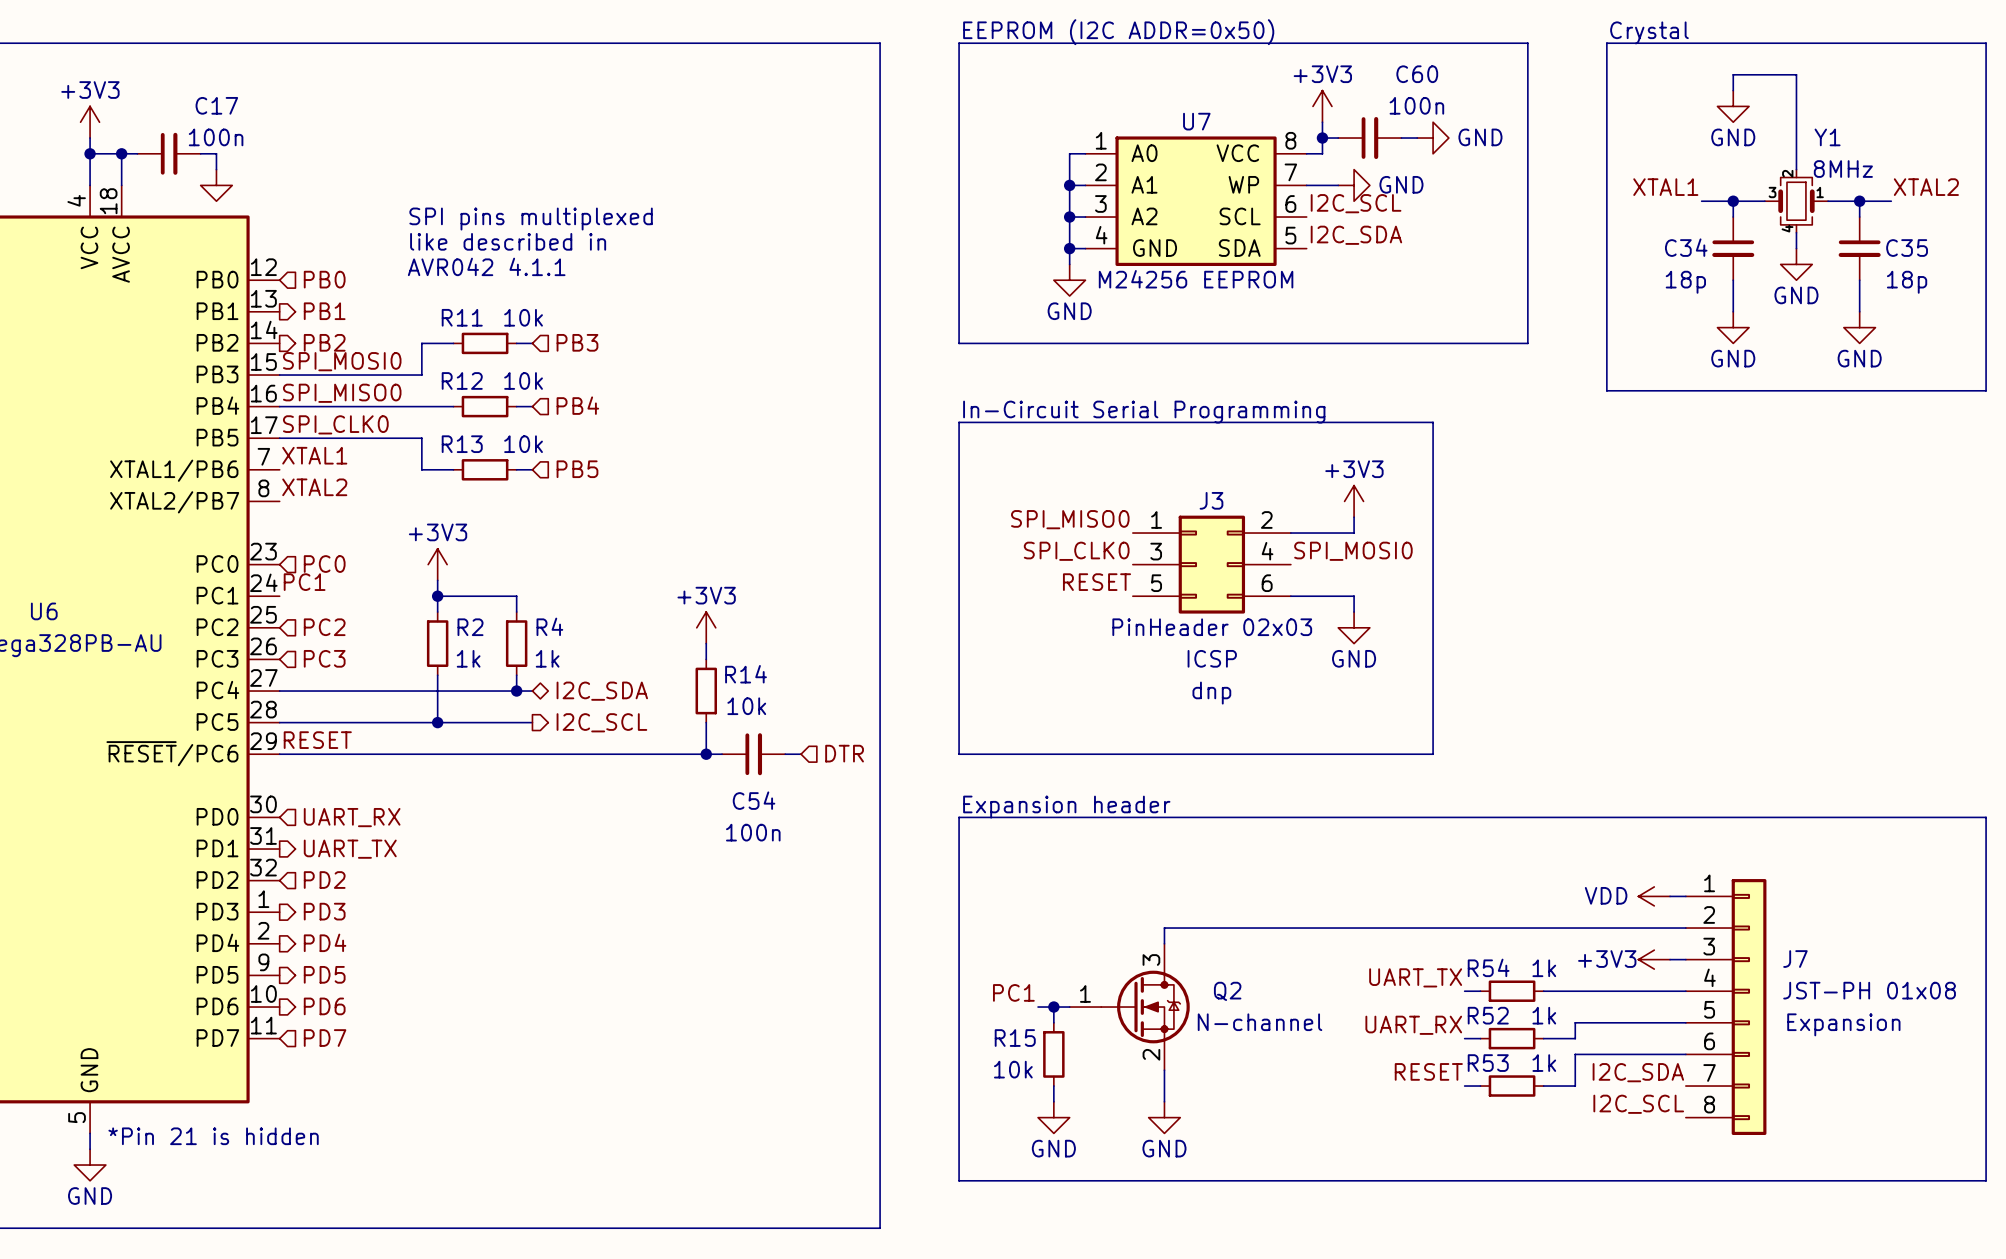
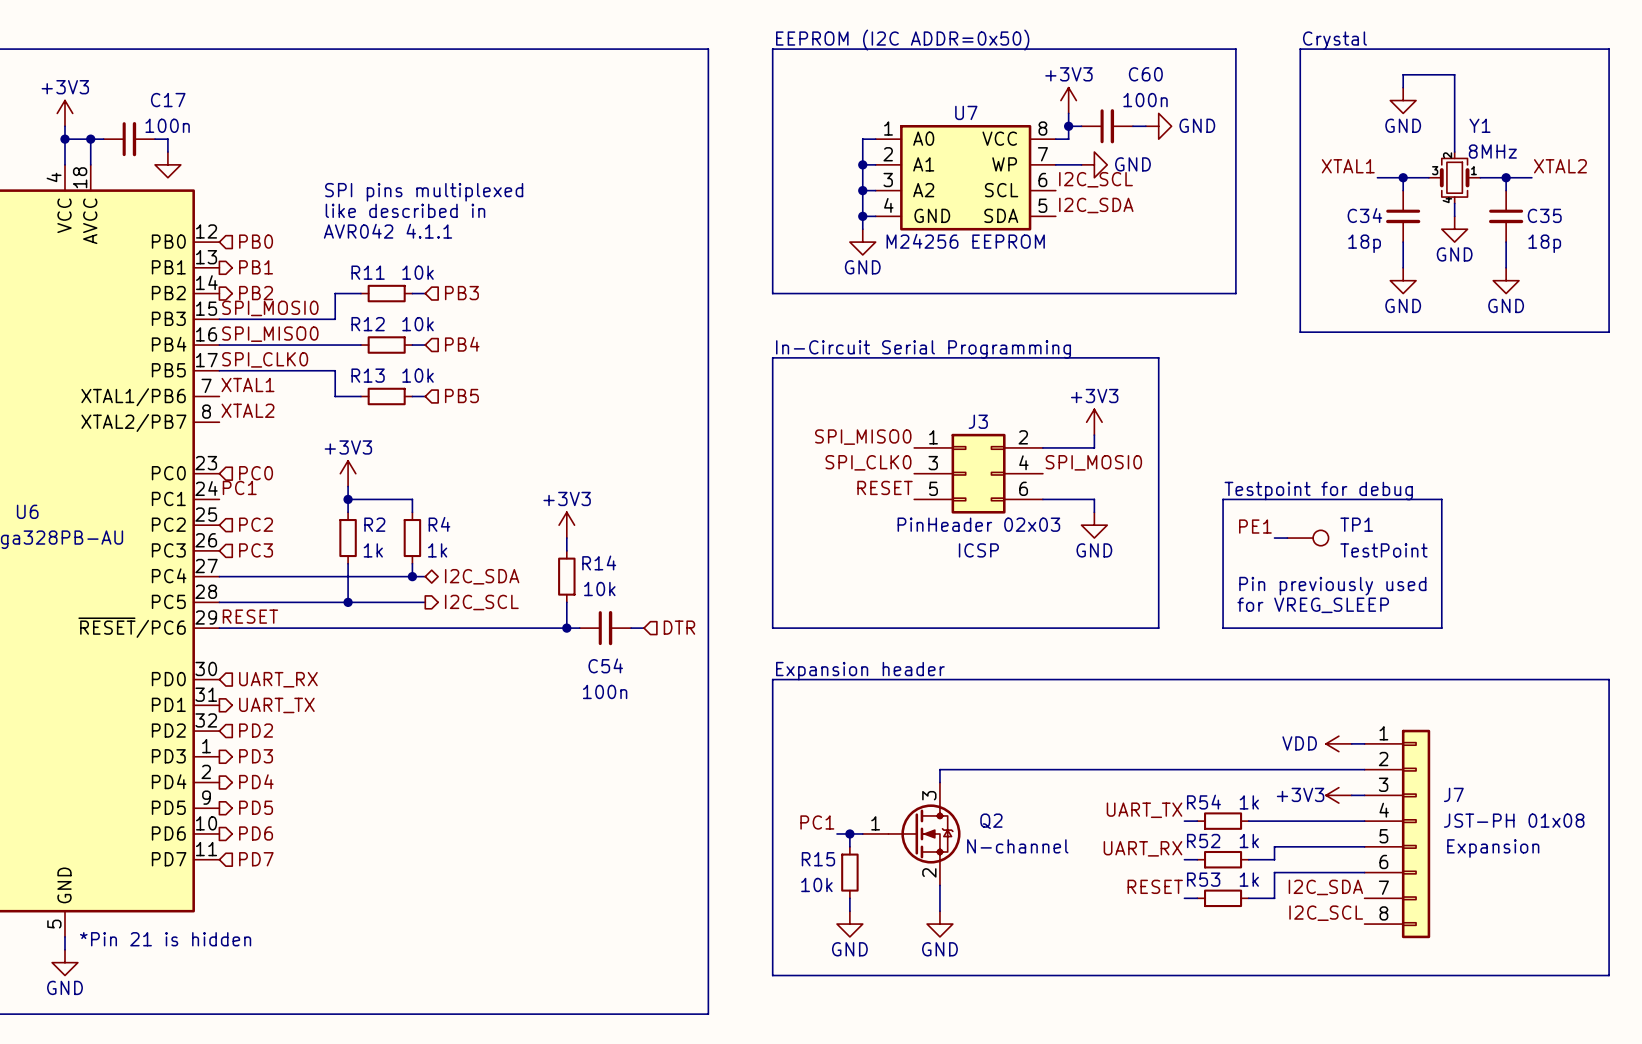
text: none -> Testpoint for debug (1318, 491)
line: none -> (1223, 499) (1223, 628) (1441, 628) (1441, 499) (1223, 499)
label: none -> PE1 (1255, 526)
wire: none -> (1274, 538) (1287, 538)
TP1: none -> TestPoint (1307, 538)
J3 text: dnp (1211, 693) -> none
text: none -> Pin previously used (1332, 586)
text: none -> for VREG_SLEEP (1313, 605)

